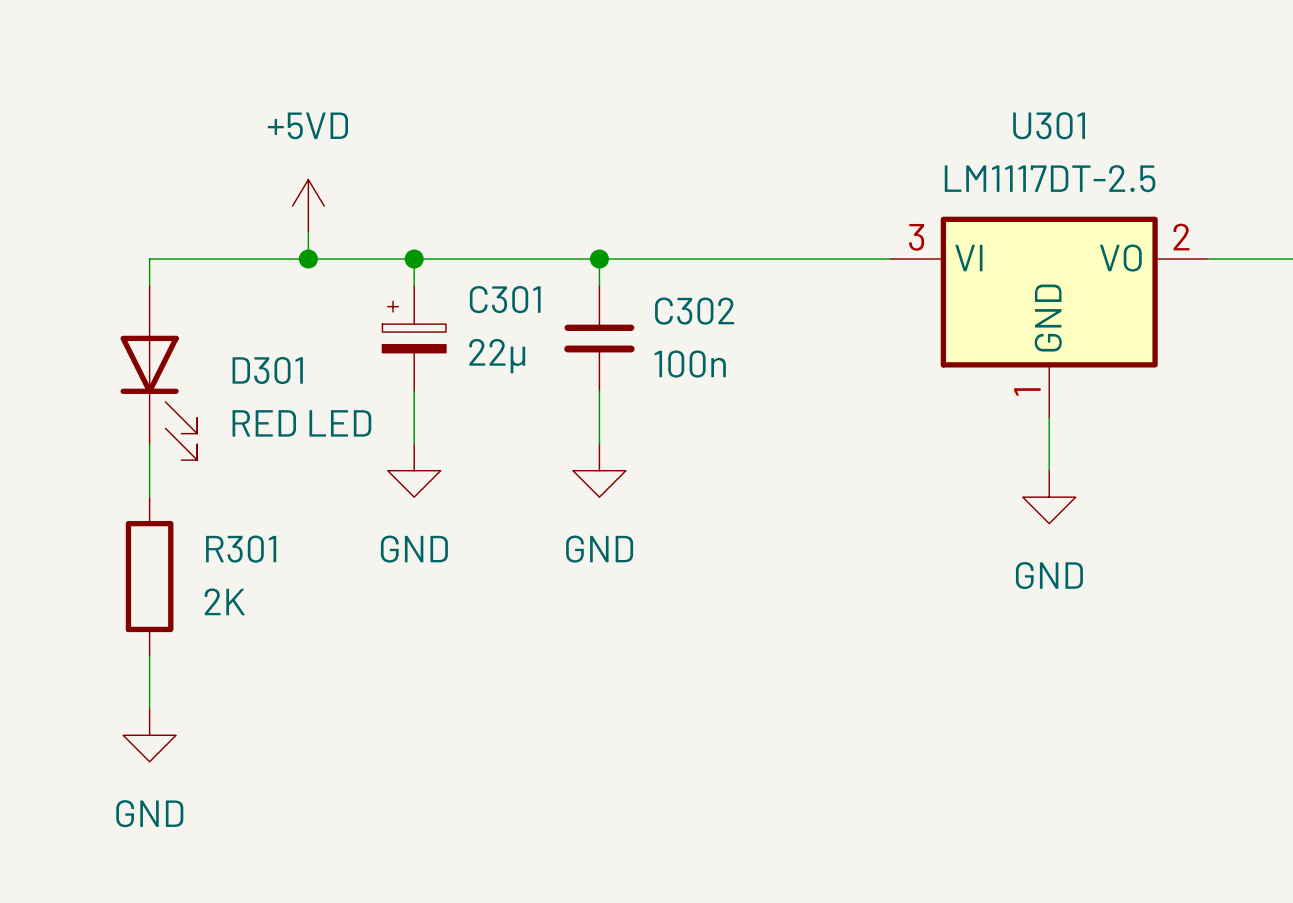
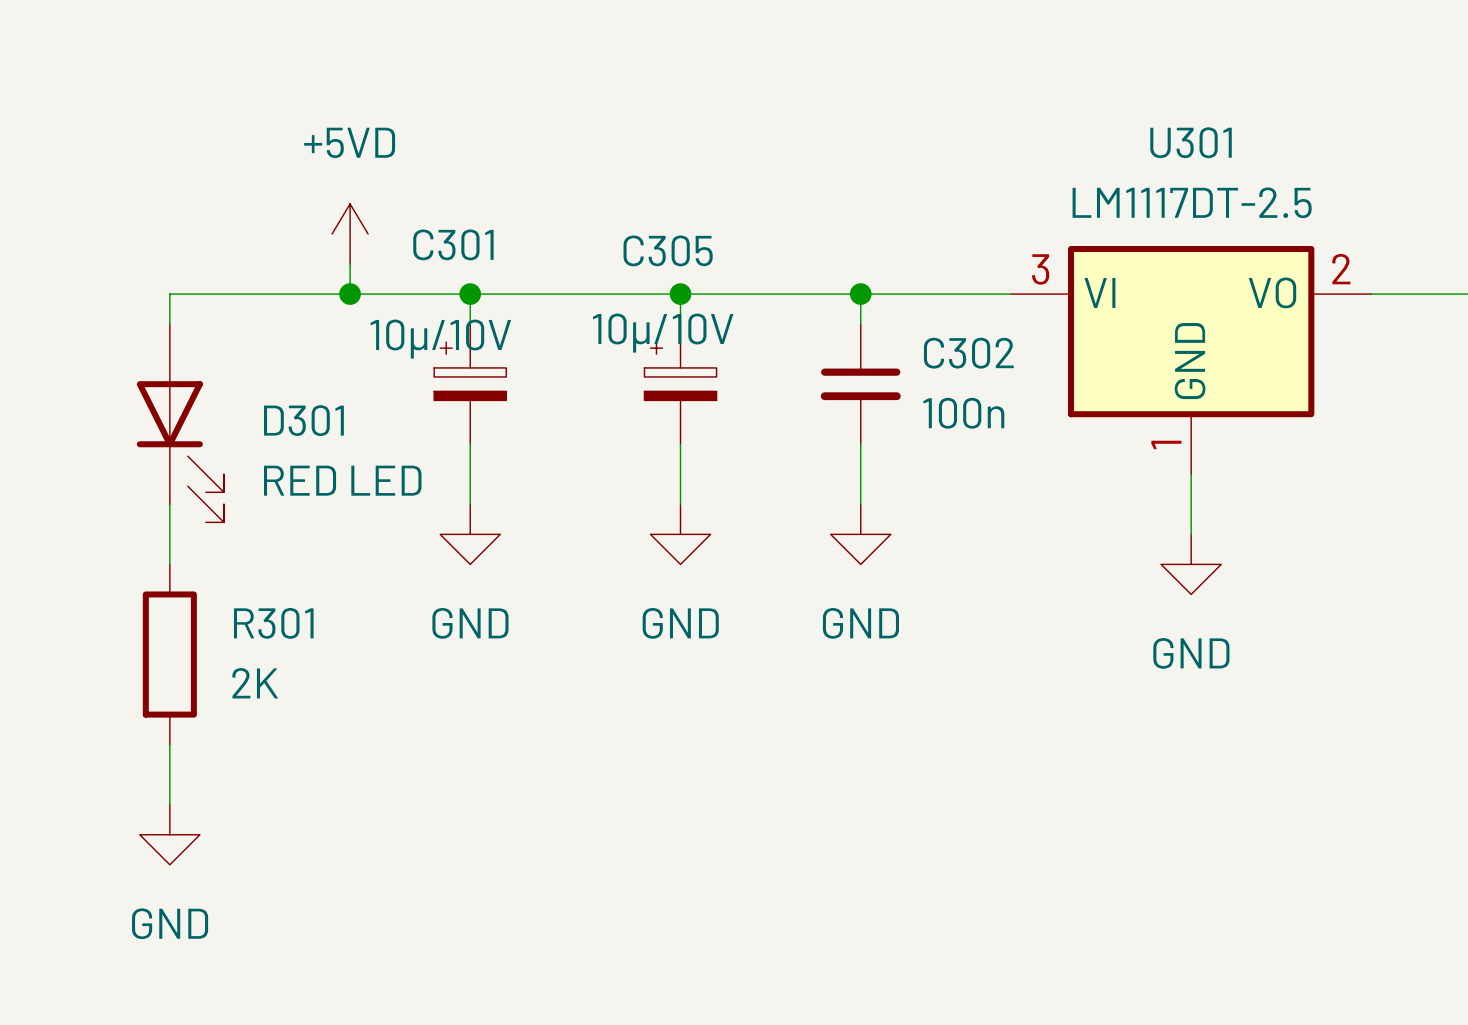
wire: none -> (860, 294) (860, 324)
junction: none -> (860, 294)
C301 name position: C301 (505, 299) -> C301 (453, 244)
C302 position: (599, 338) -> (860, 384)
C305: none -> 10µ/10V (680, 384)
C301 value: 22µ (497, 356) -> 10µ/10V (440, 339)
wire: none -> (860, 444) (860, 504)
power symbol: none -> GND (860, 534)

